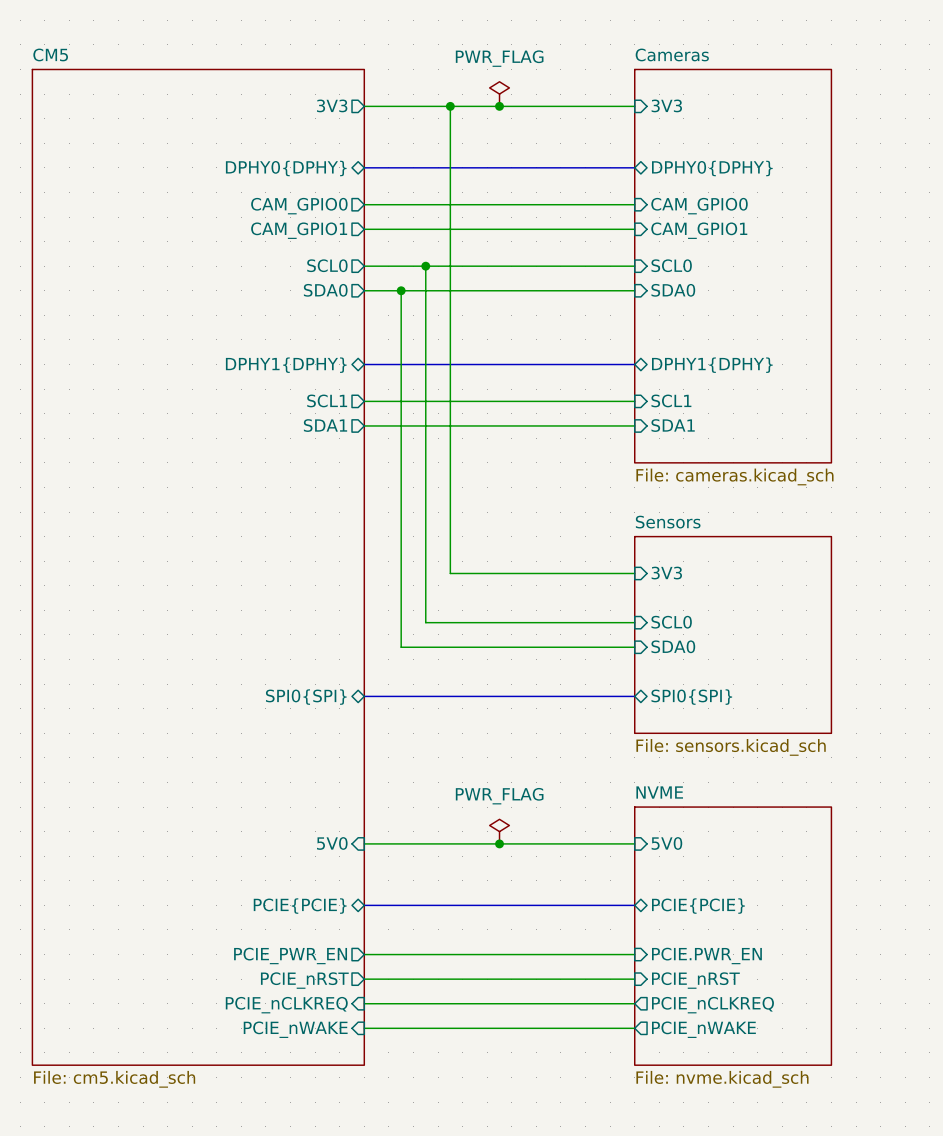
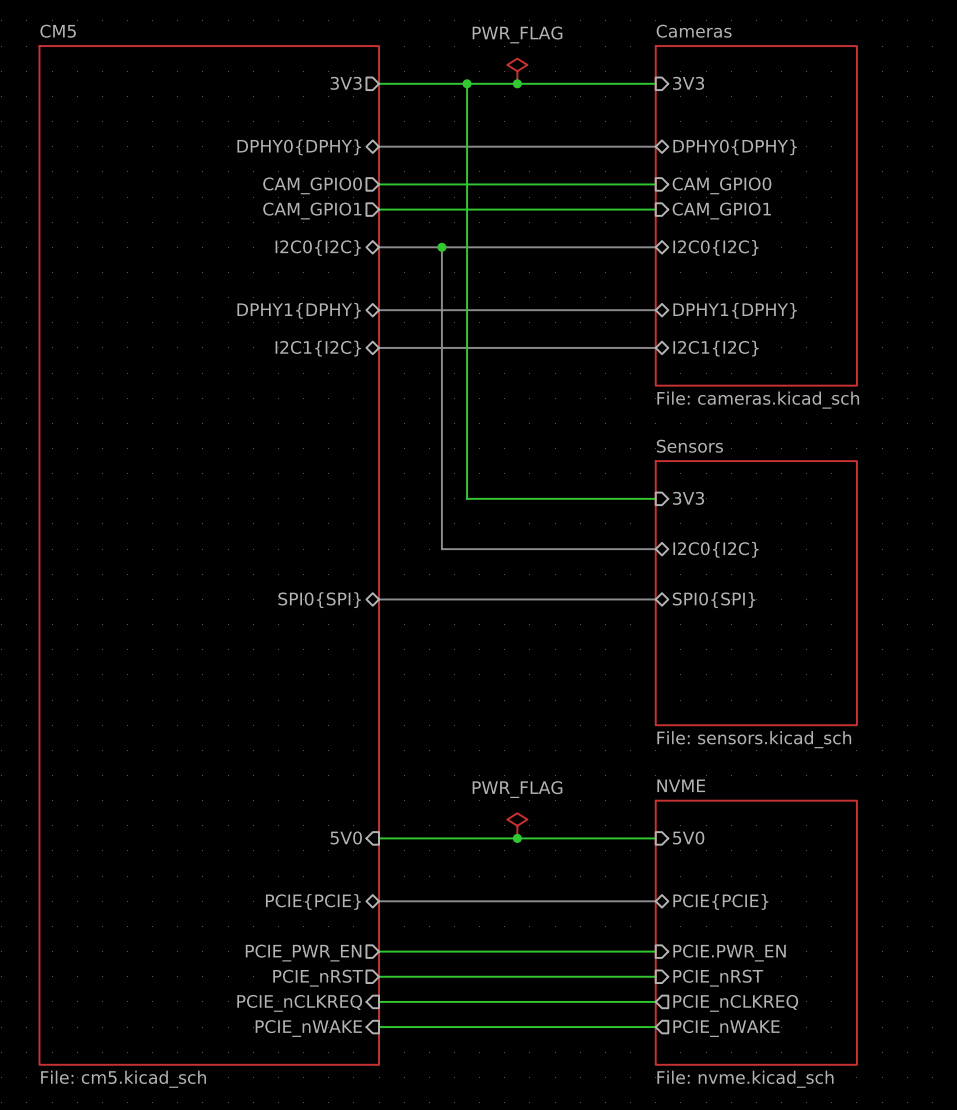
sheet Cameras: none -> File: cameras.kicad_sch (756, 215)
sheet pin shape: output (327, 265) -> bidirectional (318, 247)
sheet pin: SCL0 (327, 265) -> I2C0{I2C} (318, 247)
sheet pin shape: input (671, 265) -> bidirectional (716, 247)
sheet pin: SCL0 (671, 265) -> I2C0{I2C} (716, 247)
bus: none -> (379, 247) (655, 247)
wire: (425, 266) (425, 622) (634, 622) -> none
bus: none -> (441, 247) (441, 549) (655, 549)
sheet Cameras: File: cameras.kicad_sch (733, 266) -> none
sheet pin: SDA0 (325, 290) -> none
wire: (364, 290) (634, 290) -> none
wire: (401, 290) (401, 647) (634, 647) -> none
junction: (401, 290) -> none
sheet pin: SDA0 (673, 290) -> none
bus: none -> (379, 310) (655, 310)
sheet pin: none -> DPHY1{DPHY} (299, 310)
sheet pin: none -> DPHY1{DPHY} (735, 310)
sheet pin: DPHY1{DPHY} (286, 365) -> I2C1{I2C} (318, 348)
sheet pin: DPHY1{DPHY} (712, 365) -> I2C1{I2C} (716, 348)
sheet pin: SCL1 (327, 400) -> none
sheet pin: SCL1 (671, 400) -> none
wire: (364, 401) (634, 401) -> none
sheet pin: SDA1 (325, 425) -> none
wire: (364, 425) (634, 425) -> none
sheet pin: SDA1 (673, 425) -> none
wire: (450, 512) (450, 573) (634, 573) -> (467, 498) (655, 498)
sheet pin: none -> I2C0{I2C} (716, 549)
sheet pin position: 3V3 (666, 573) -> 3V3 (688, 498)
sheet Sensors: none -> File: sensors.kicad_sch (756, 593)
sheet pin: SCL0 (671, 622) -> none
sheet Sensors: File: sensors.kicad_sch (733, 634) -> none
sheet pin: SDA0 (673, 646) -> none
bus: (364, 696) (634, 696) -> (379, 599) (655, 599)
sheet pin position: SPI0{SPI} (306, 697) -> SPI0{SPI} (319, 600)
sheet pin position: SPI0{SPI} (691, 697) -> SPI0{SPI} (714, 600)

